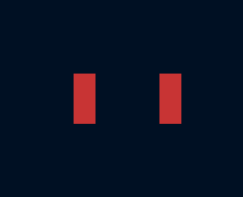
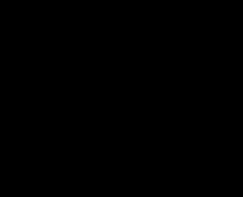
part: (127, 98) -> none

